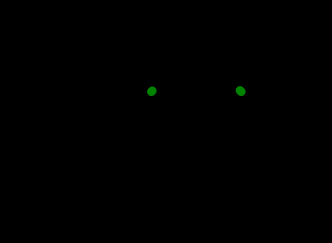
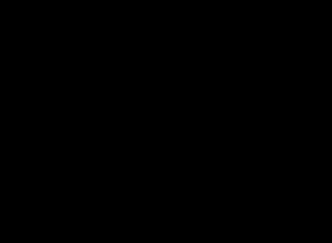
bottom track: (152, 90) (151, 91) -> none
bottom track: (240, 90) (241, 91) -> none

